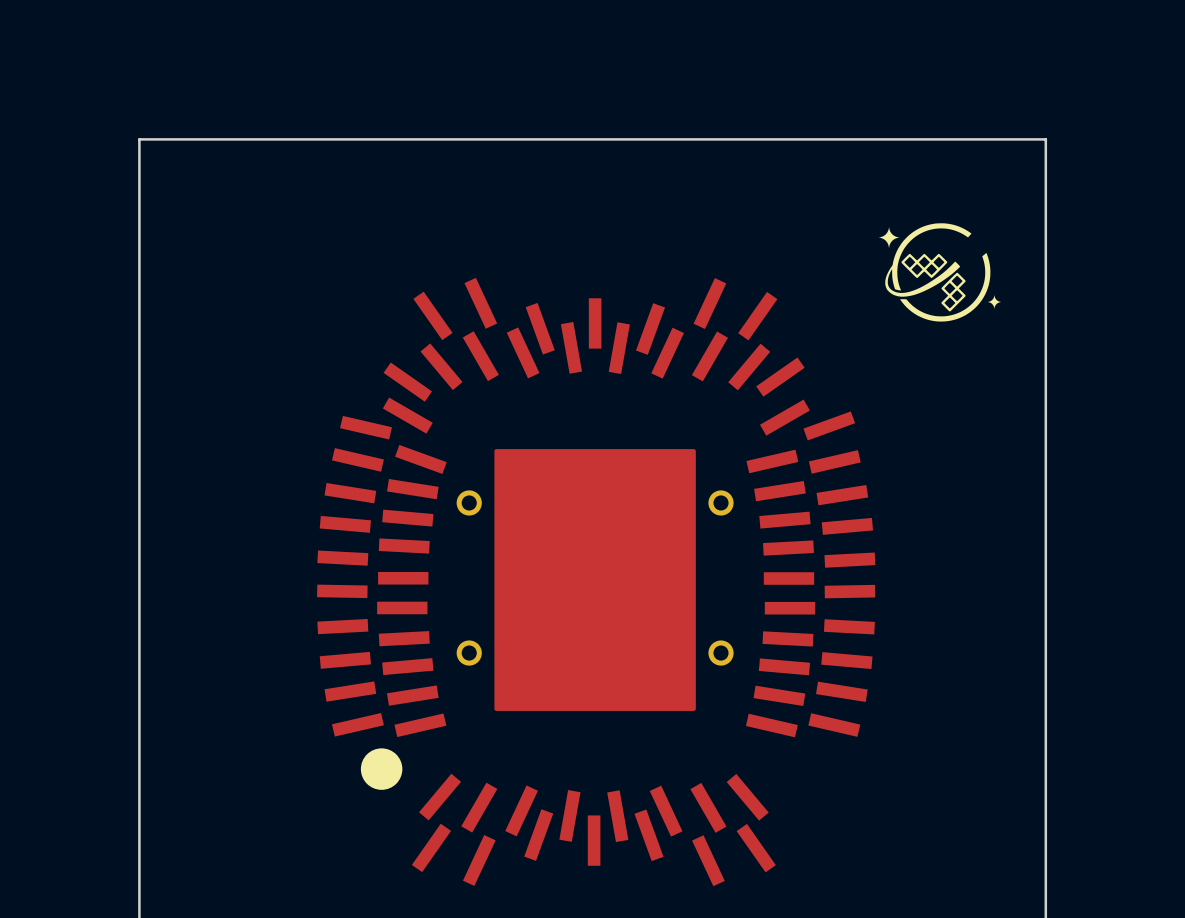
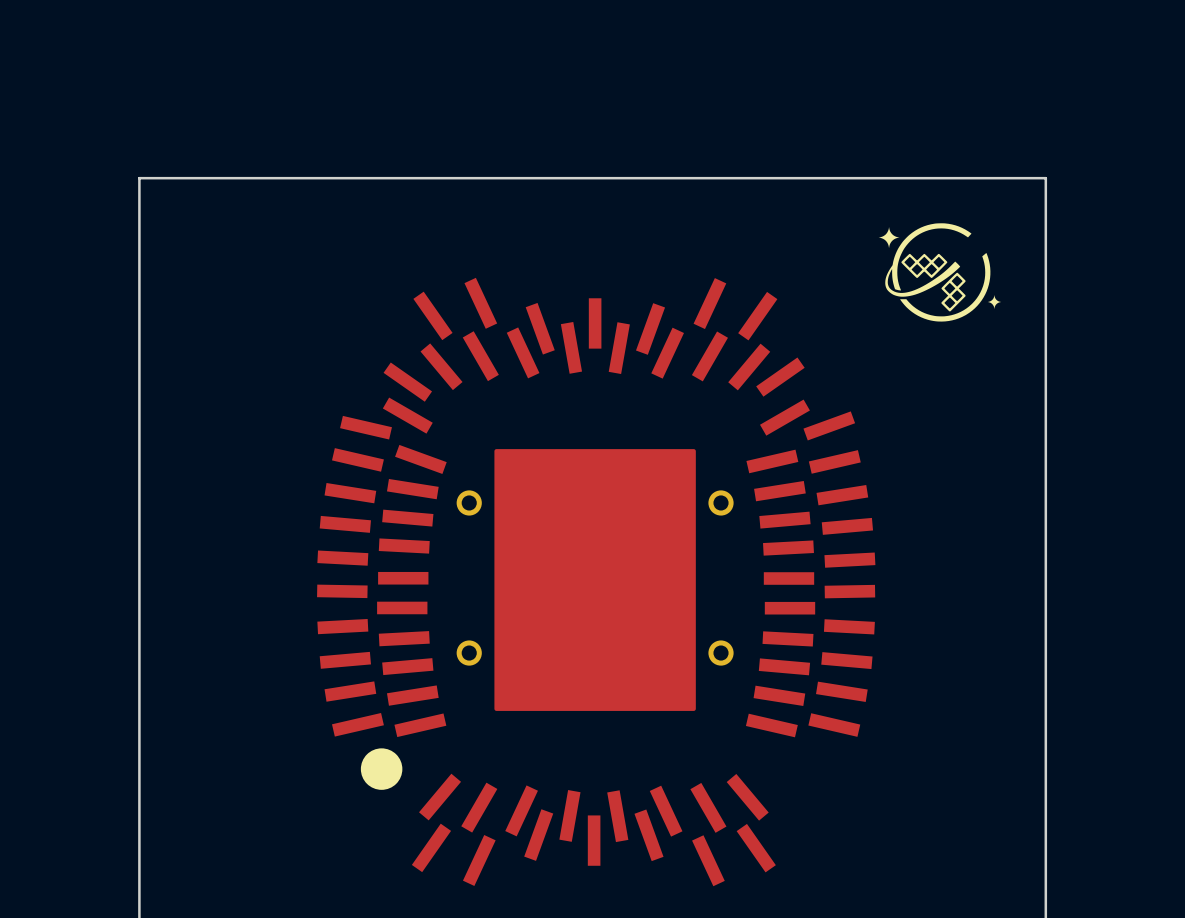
board edge: (139, 178) (139, 139) (1045, 139) (1045, 178) -> (139, 178) (1045, 178)

